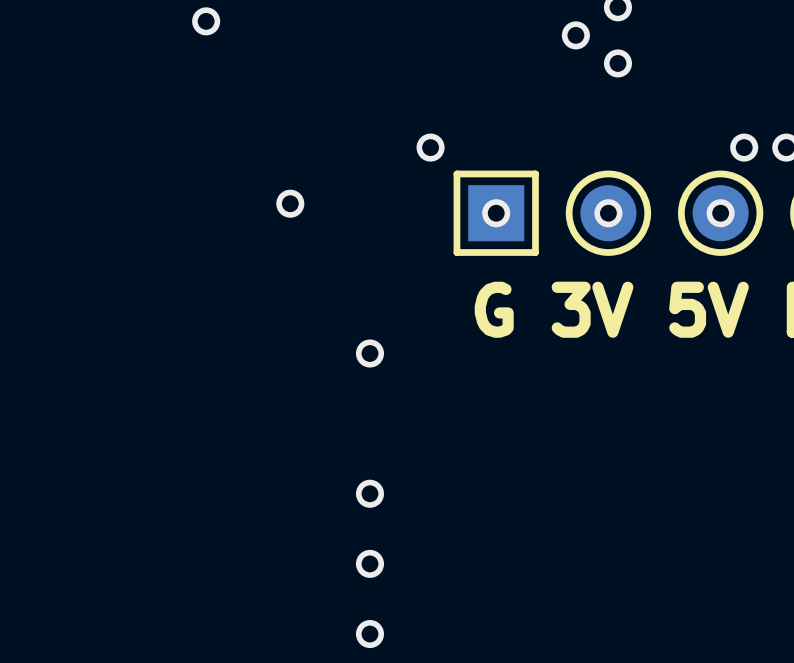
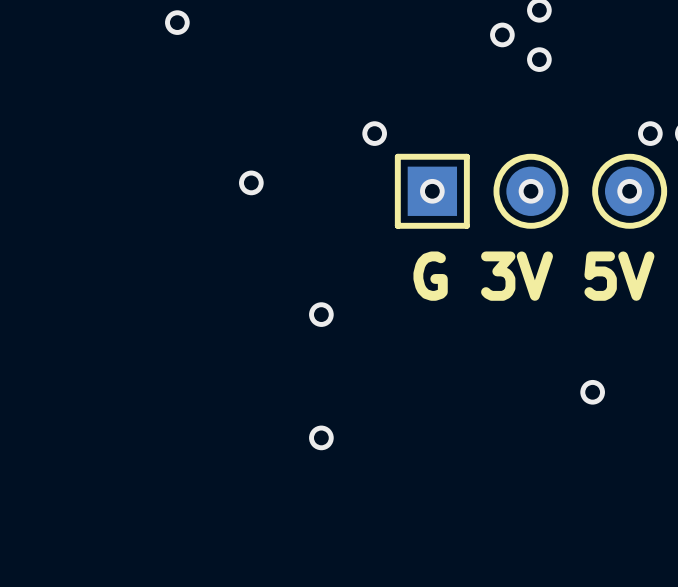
via: none -> (592, 392)
via: (369, 563) -> none
via: (369, 634) -> none

